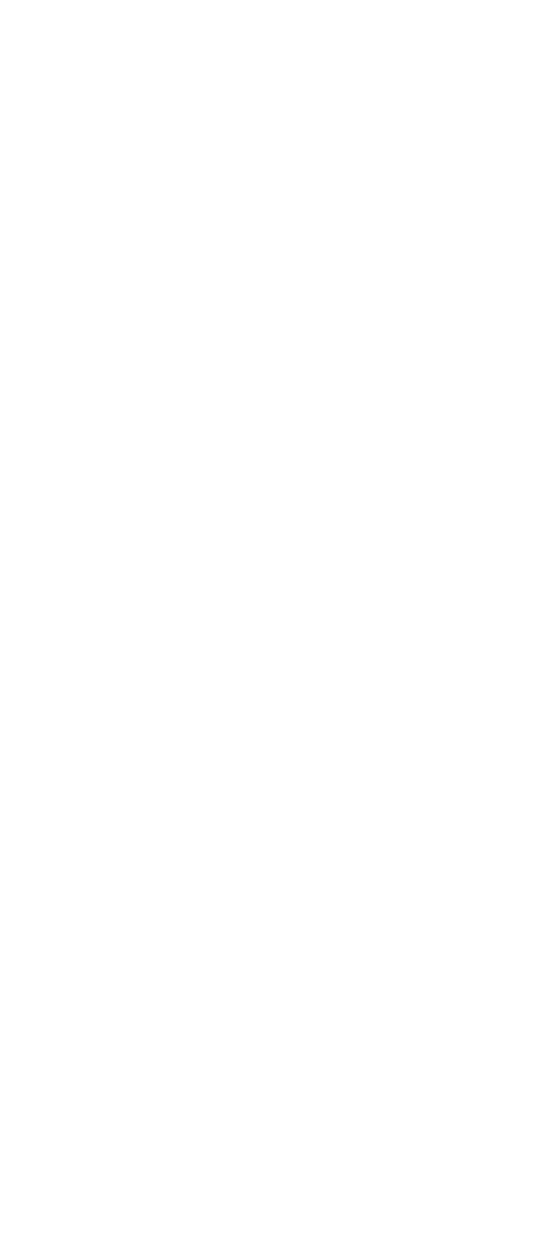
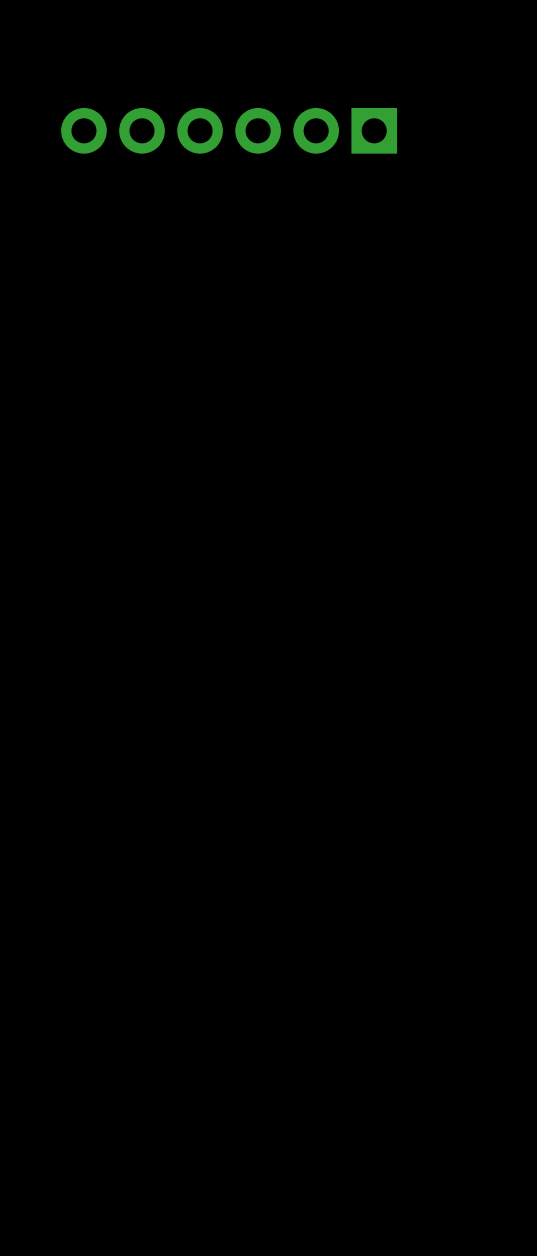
part: none -> (229, 130)

